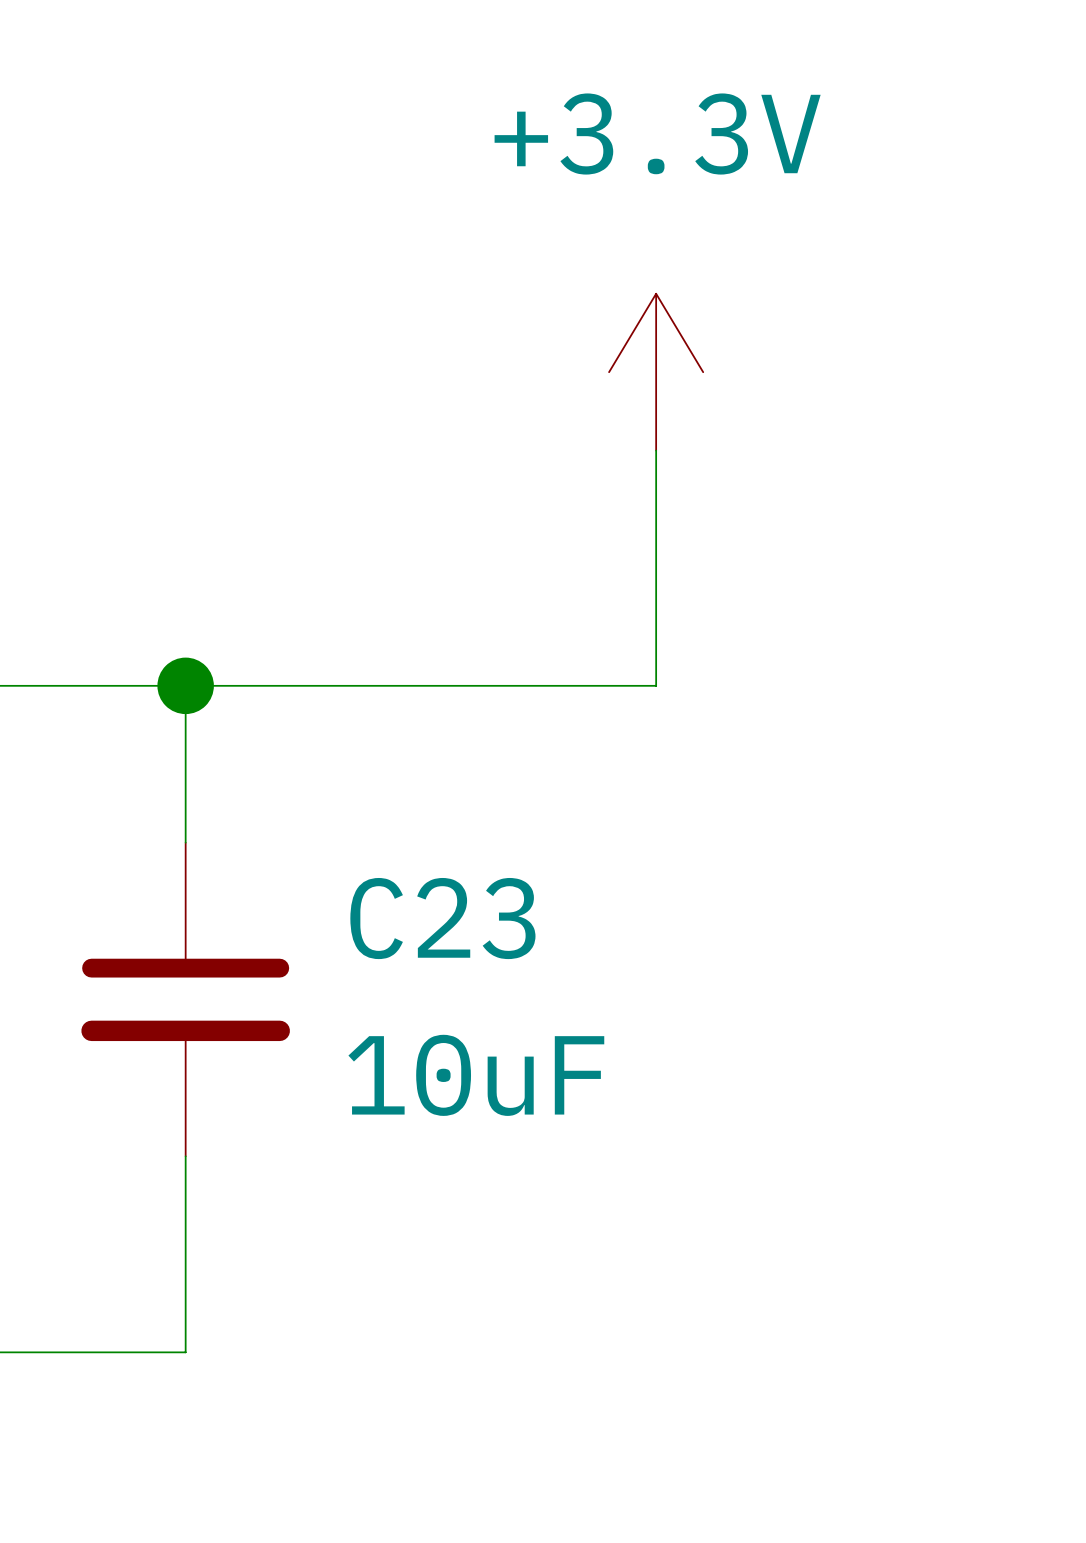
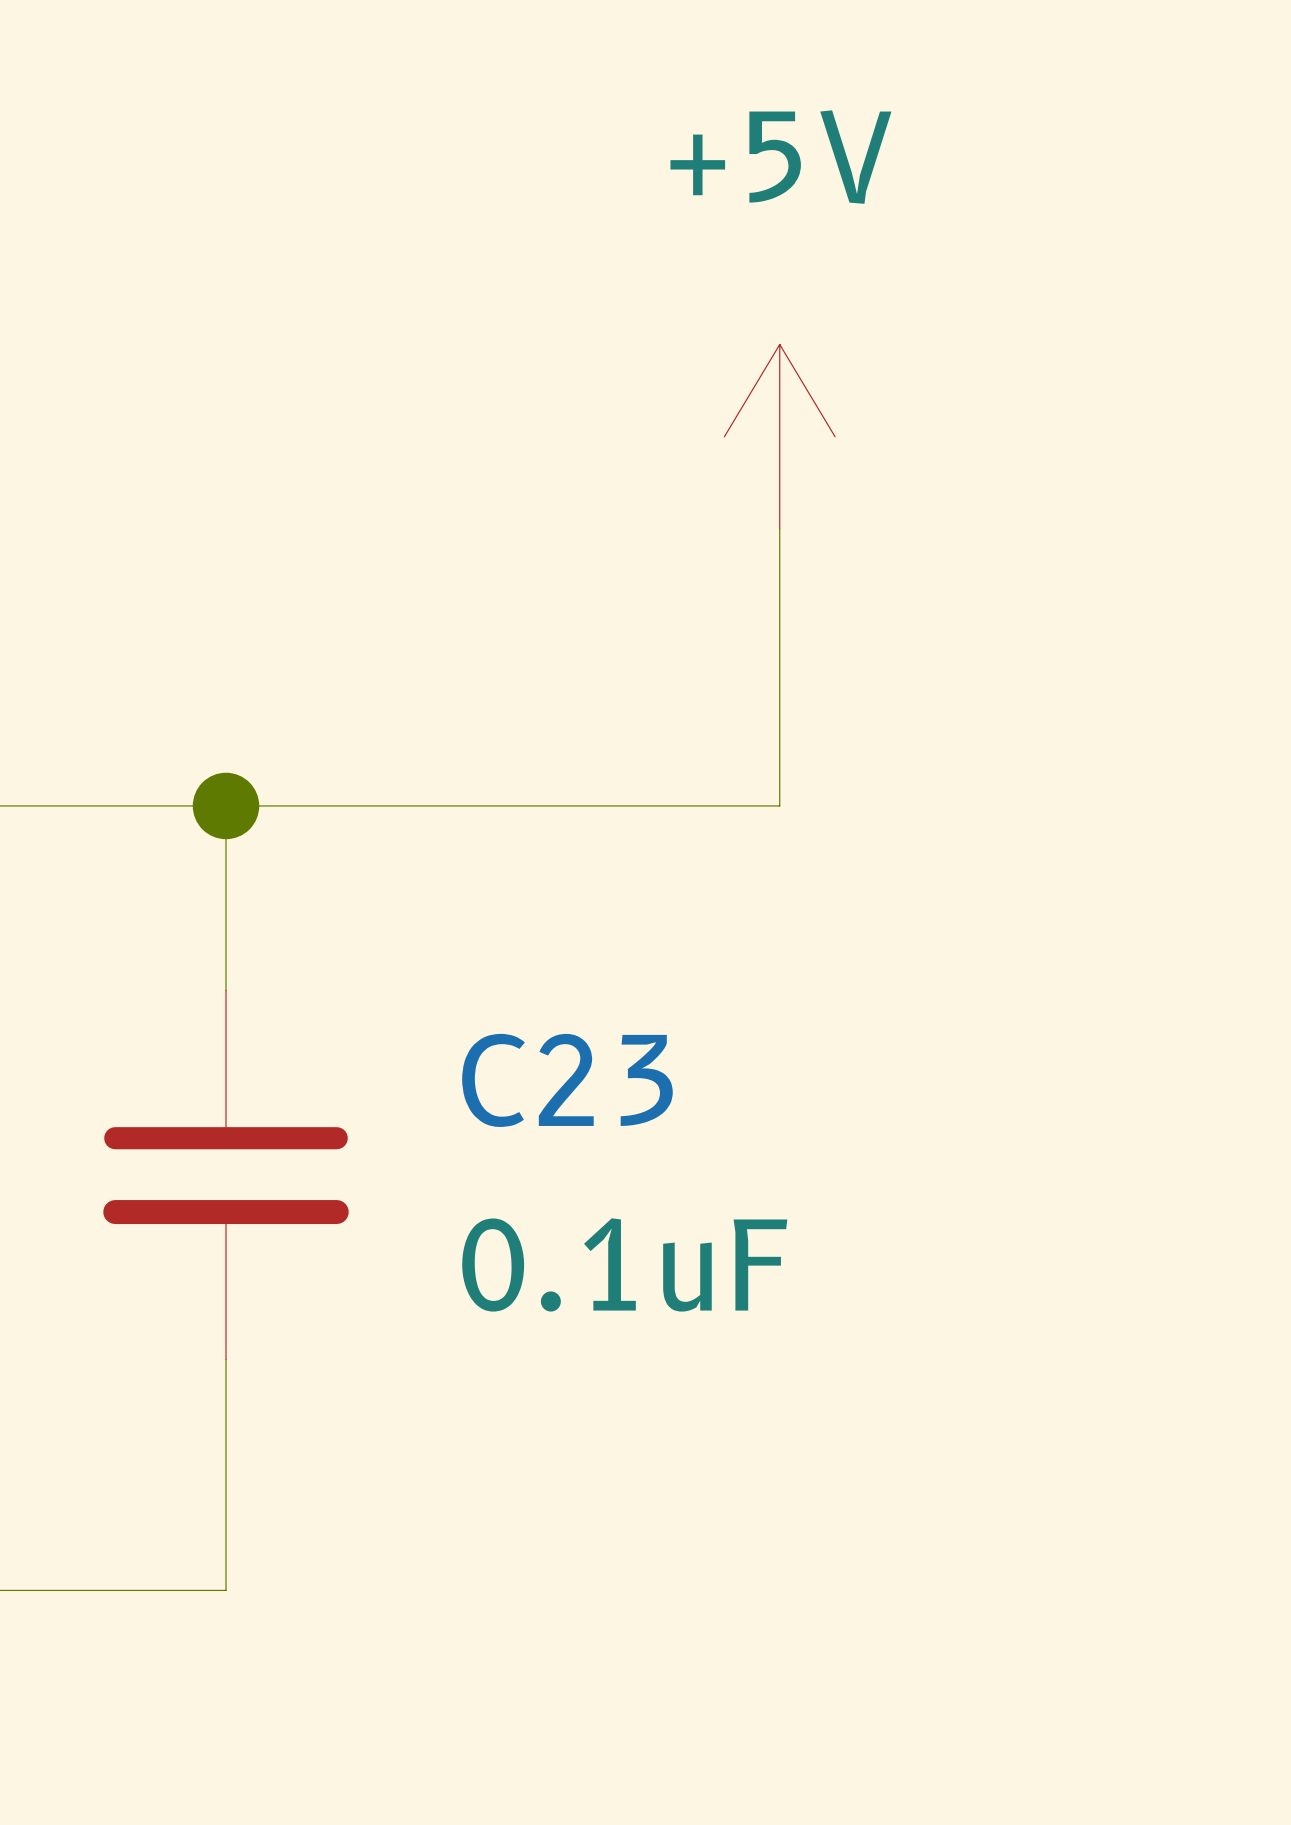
power symbol: +3.3V (656, 372) -> +5V (779, 436)
C23 name position: C23 (442, 918) -> C23 (567, 1080)
C23 value: 10uF (476, 1075) -> 0.1uF (624, 1264)

